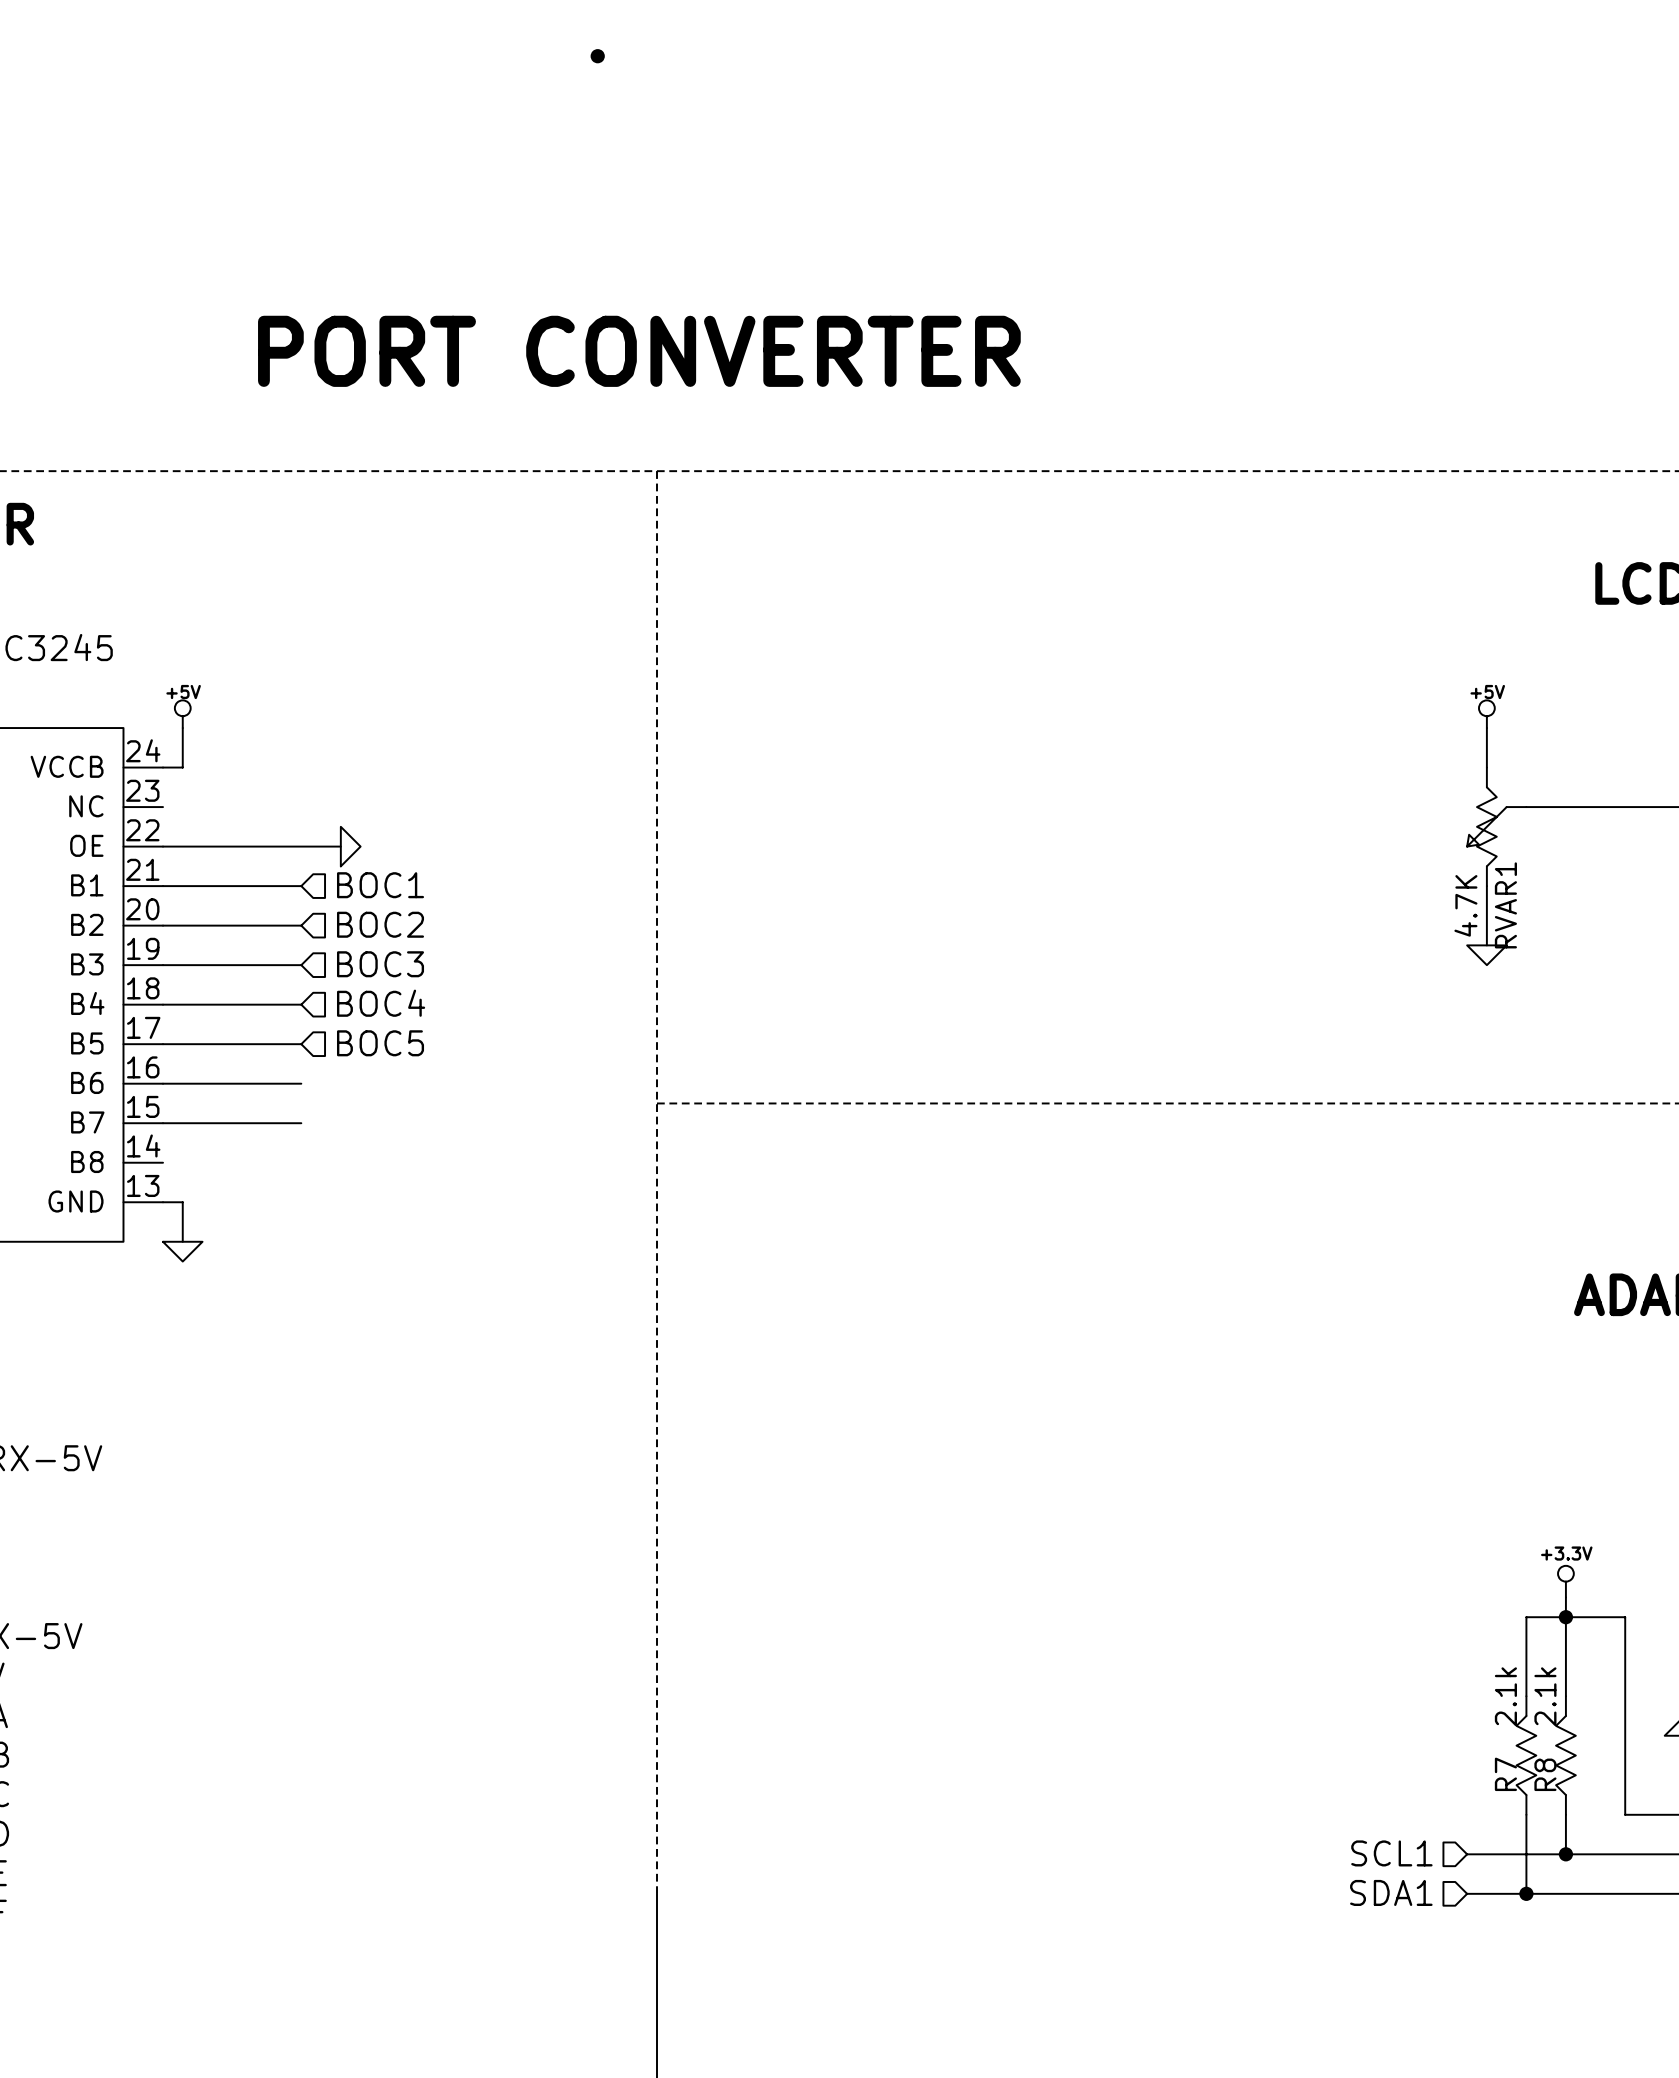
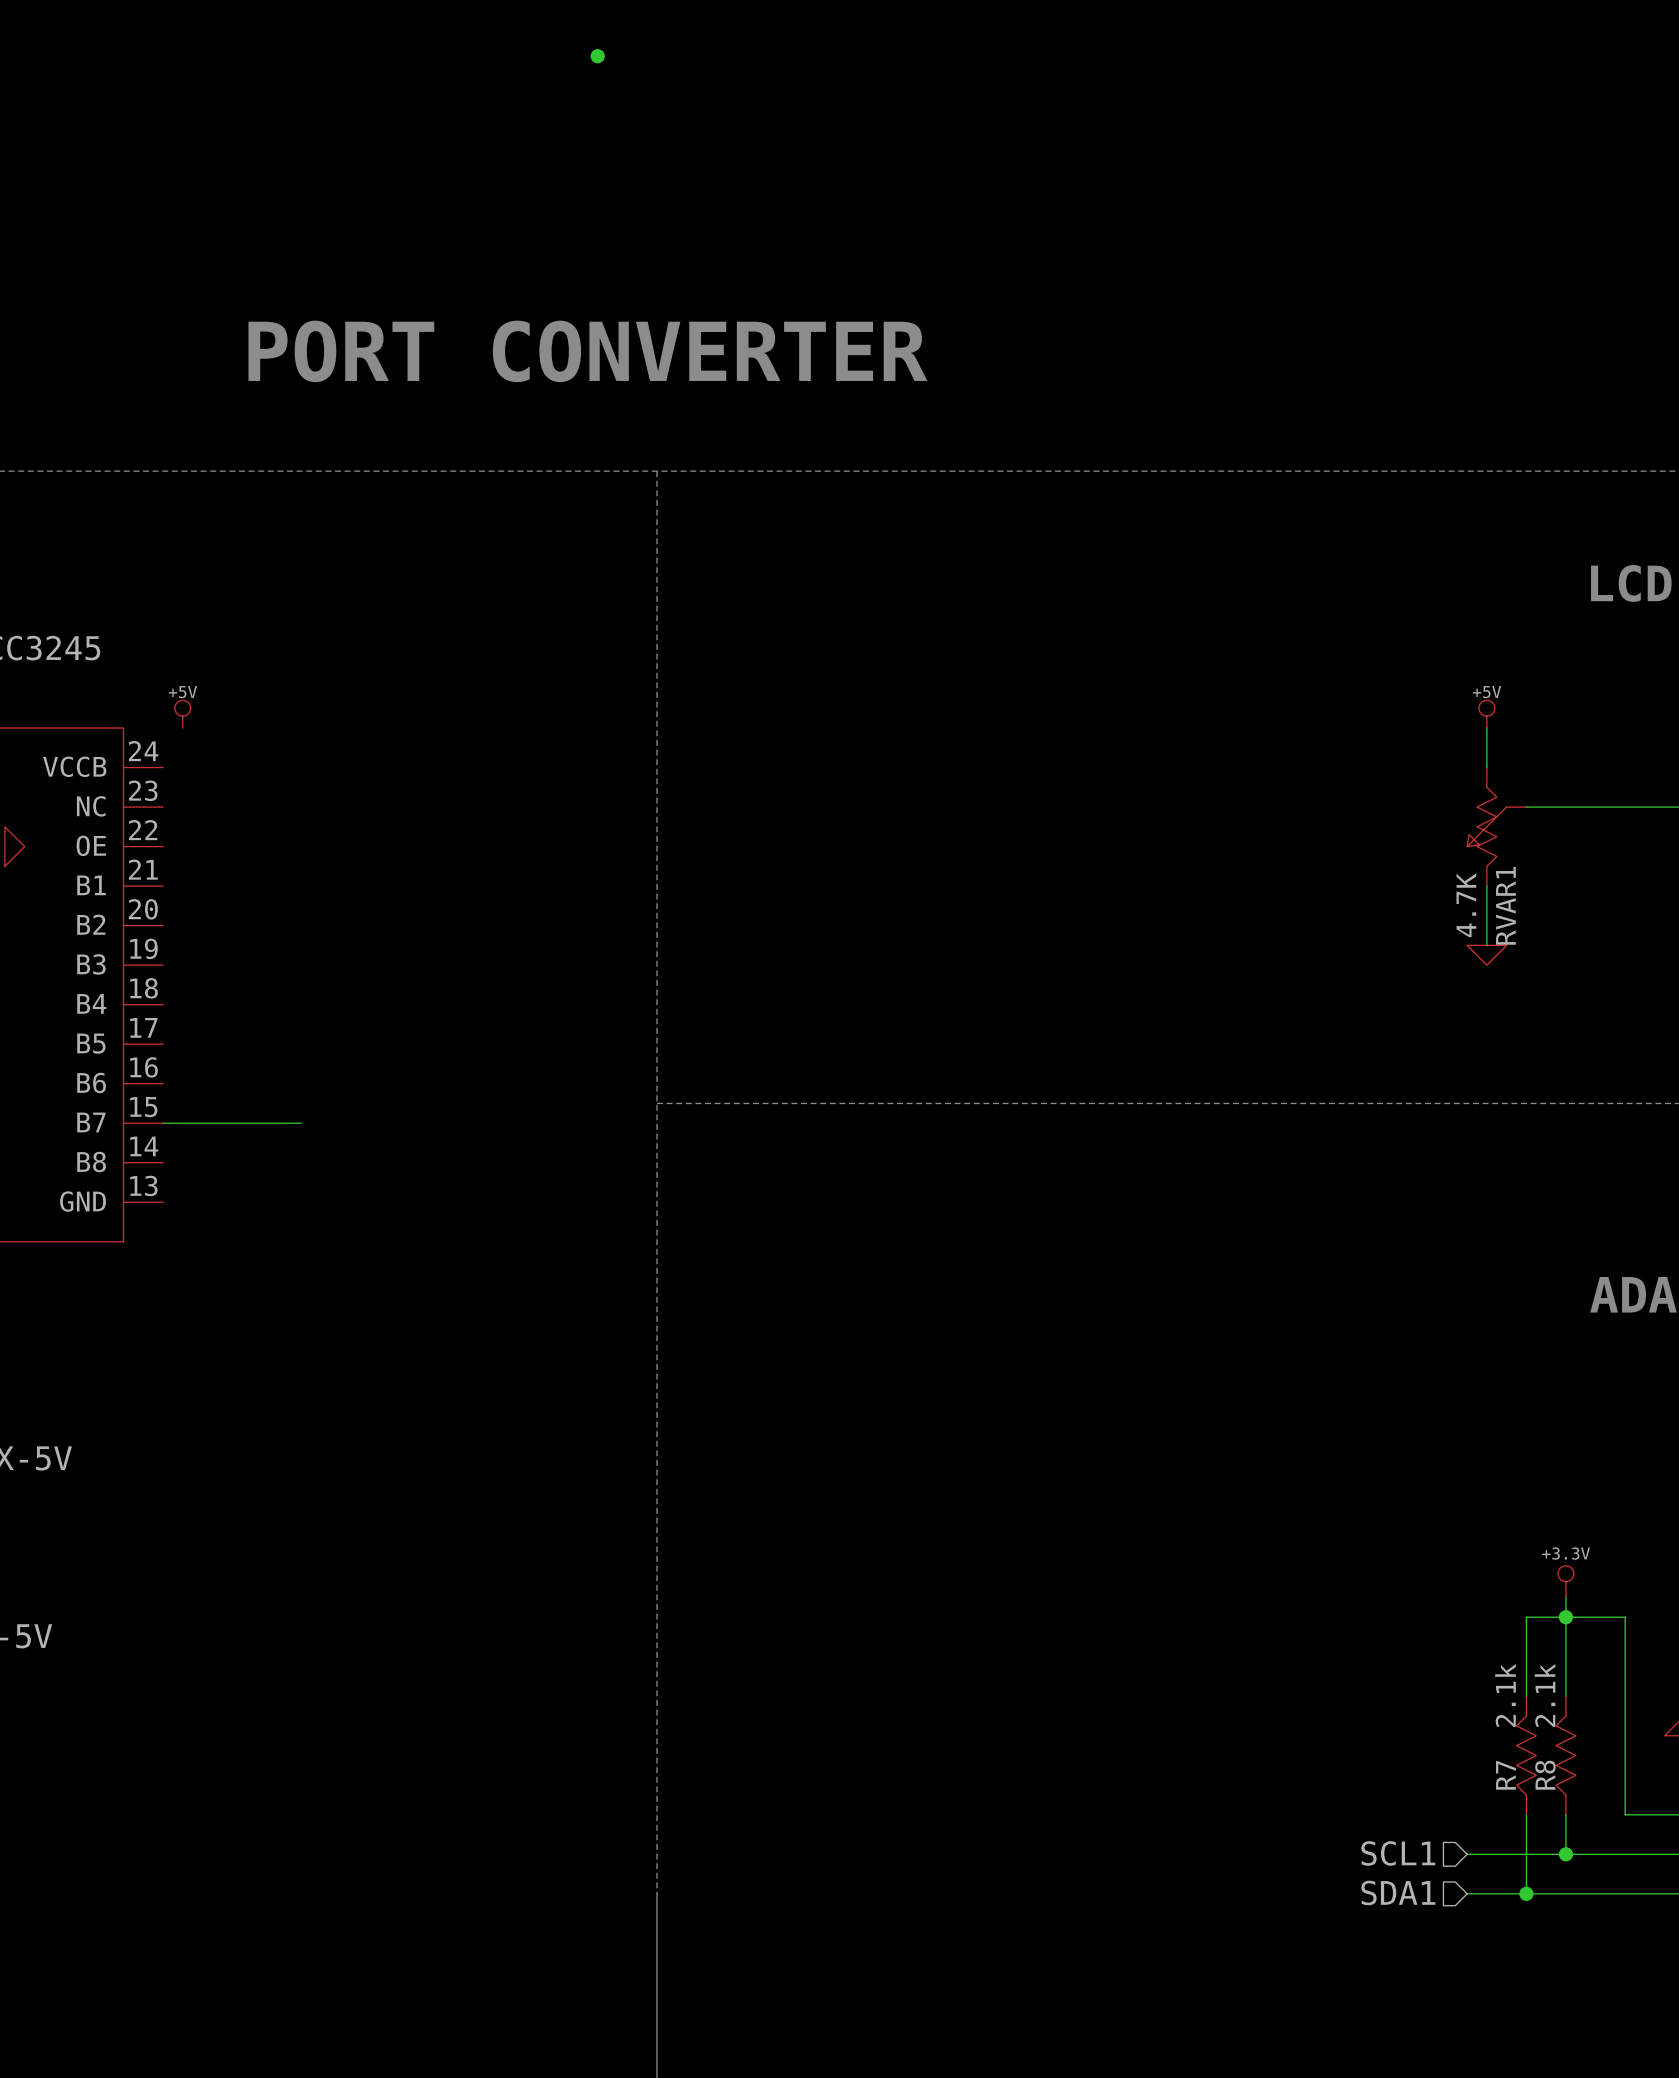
wire: (182, 728) (182, 767) (163, 767) -> none
power symbol: none -> (14, 846)
wire: (163, 846) (340, 846) -> none
power symbol: (350, 846) -> none
hierarchical label: BOC1 (380, 885) -> none
wire: (163, 886) (301, 886) -> none
hierarchical label: BOC2 (380, 924) -> none
wire: (163, 925) (301, 925) -> none
hierarchical label: BOC3 (380, 964) -> none
wire: (163, 965) (301, 965) -> none
hierarchical label: BOC4 (381, 1003) -> none
wire: (163, 1004) (301, 1004) -> none
hierarchical label: BOC5 (380, 1043) -> none
wire: (163, 1044) (301, 1044) -> none
wire: (163, 1083) (301, 1083) -> none
wire: (163, 1202) (182, 1202) (182, 1241) -> none
power symbol: (182, 1251) -> none

